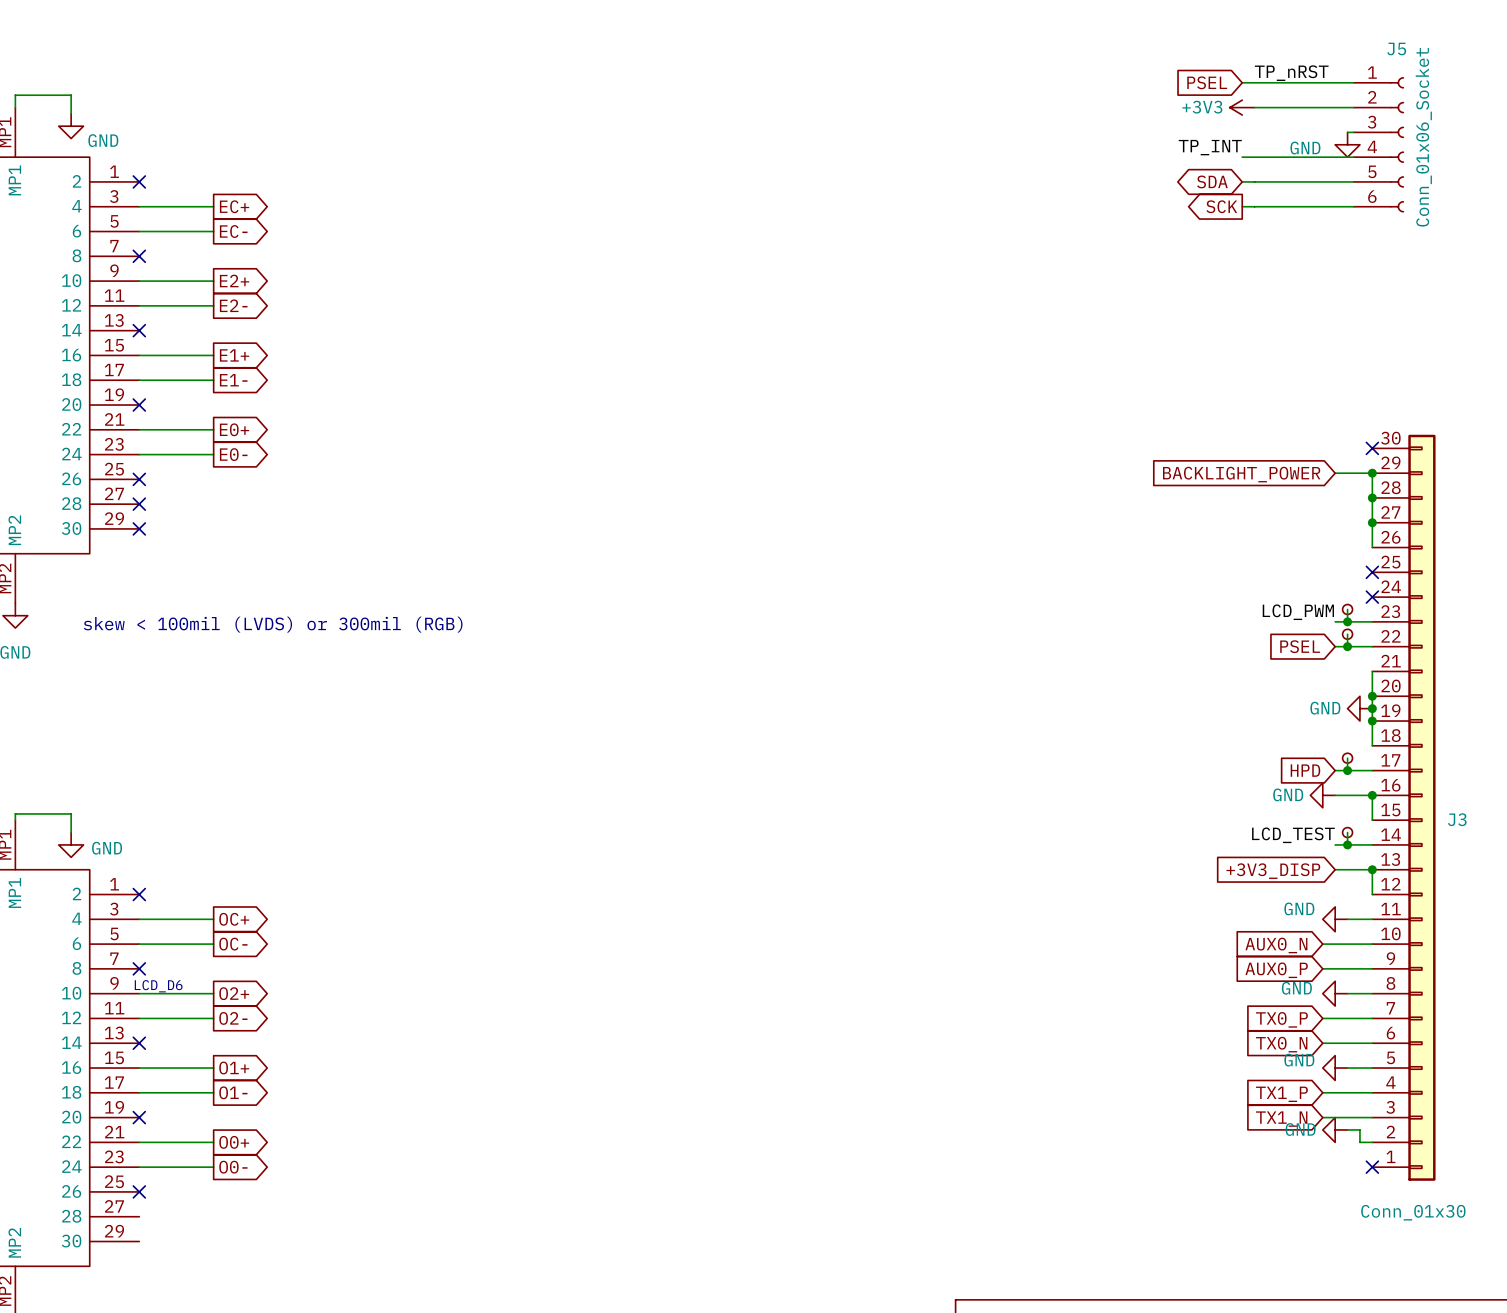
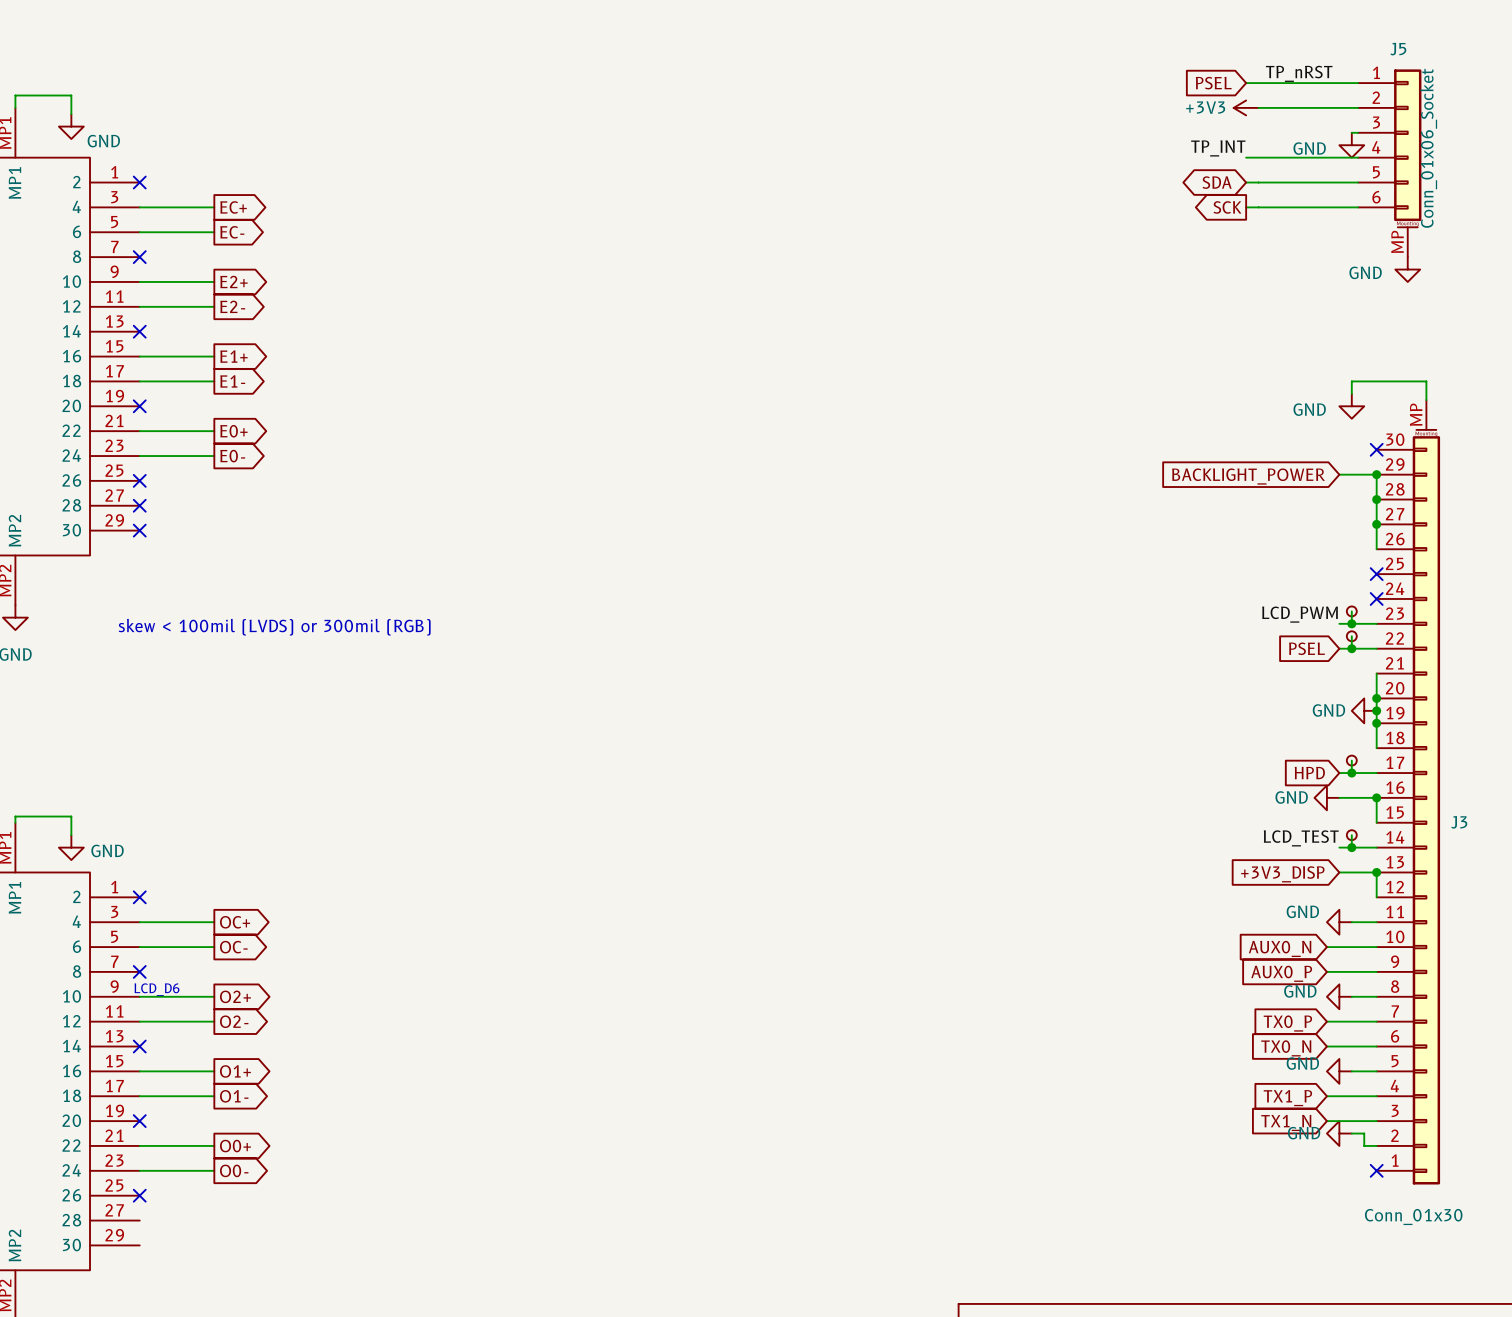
J5 symbol: [1353, 77, 1405, 213] -> [1358, 69, 1422, 258]
power symbol: none -> GND (1407, 269)
wire: none -> (1351, 393) (1351, 381) (1426, 381) (1426, 400)
power symbol: none -> GND (1351, 406)
J3 symbol: [1372, 434, 1436, 1181] -> [1376, 400, 1441, 1185]

